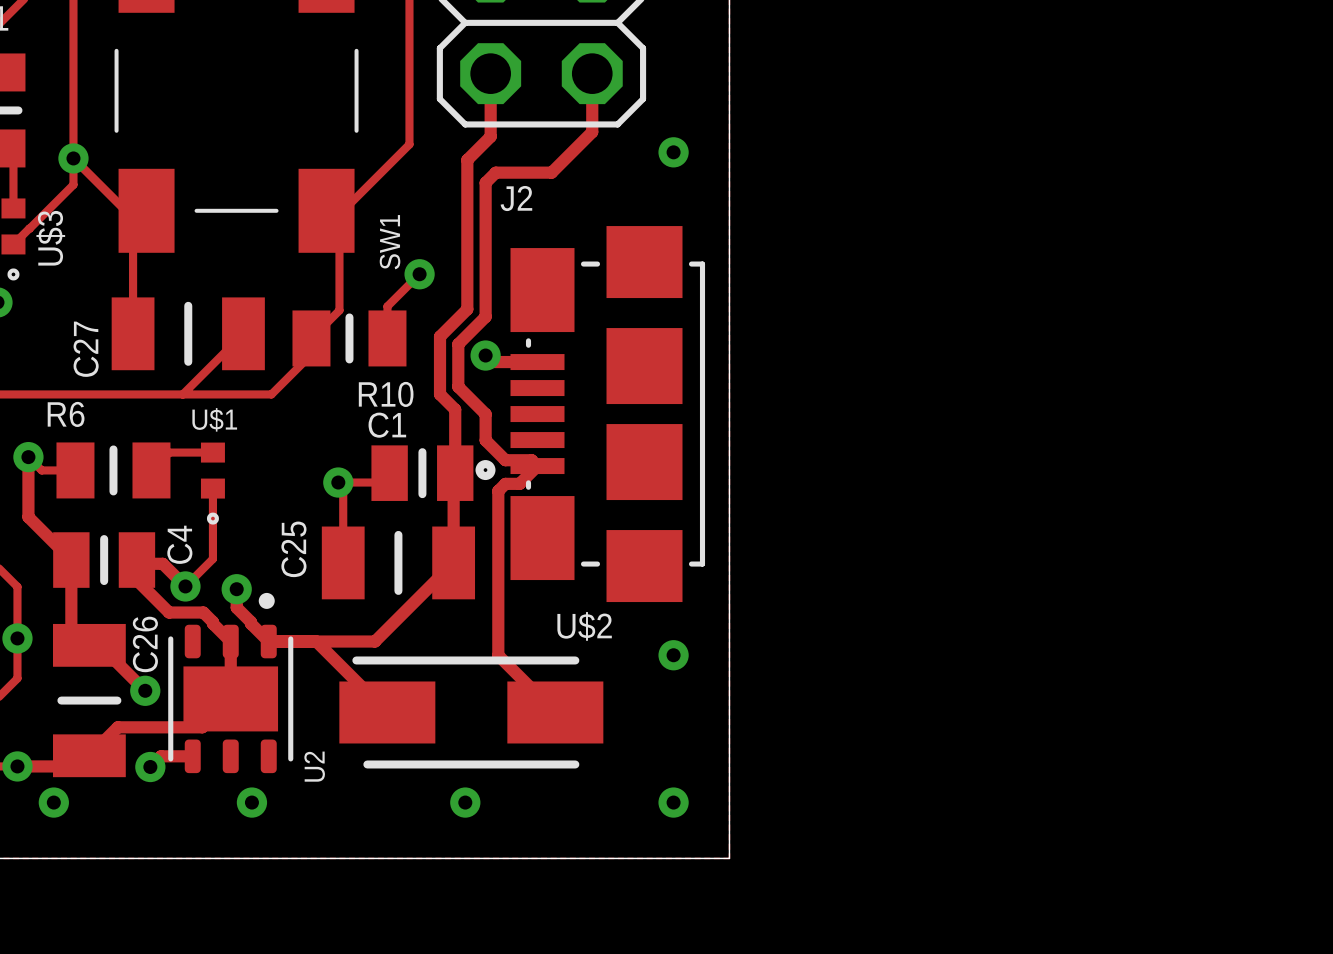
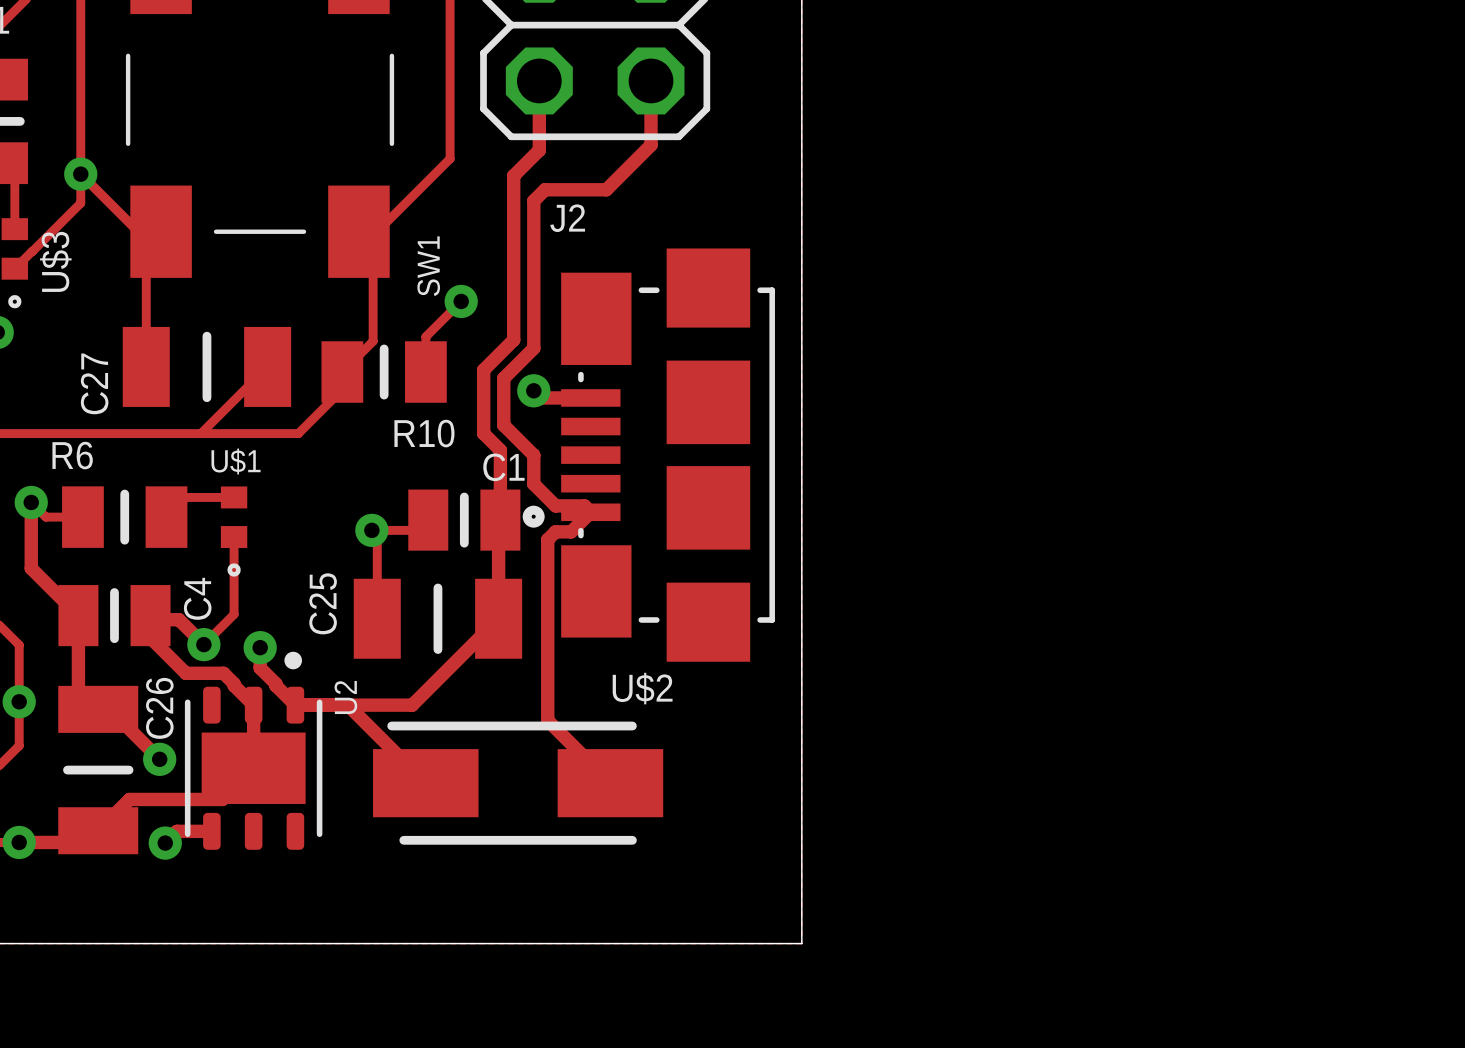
via: (673, 152) -> none
C1 name position: C1 (387, 425) -> C1 (503, 467)
via: (673, 655) -> none
U2 name position: U2 (314, 766) -> U2 (345, 697)
via: (53, 802) -> none
via: (251, 802) -> none
via: (465, 802) -> none
via: (673, 802) -> none

